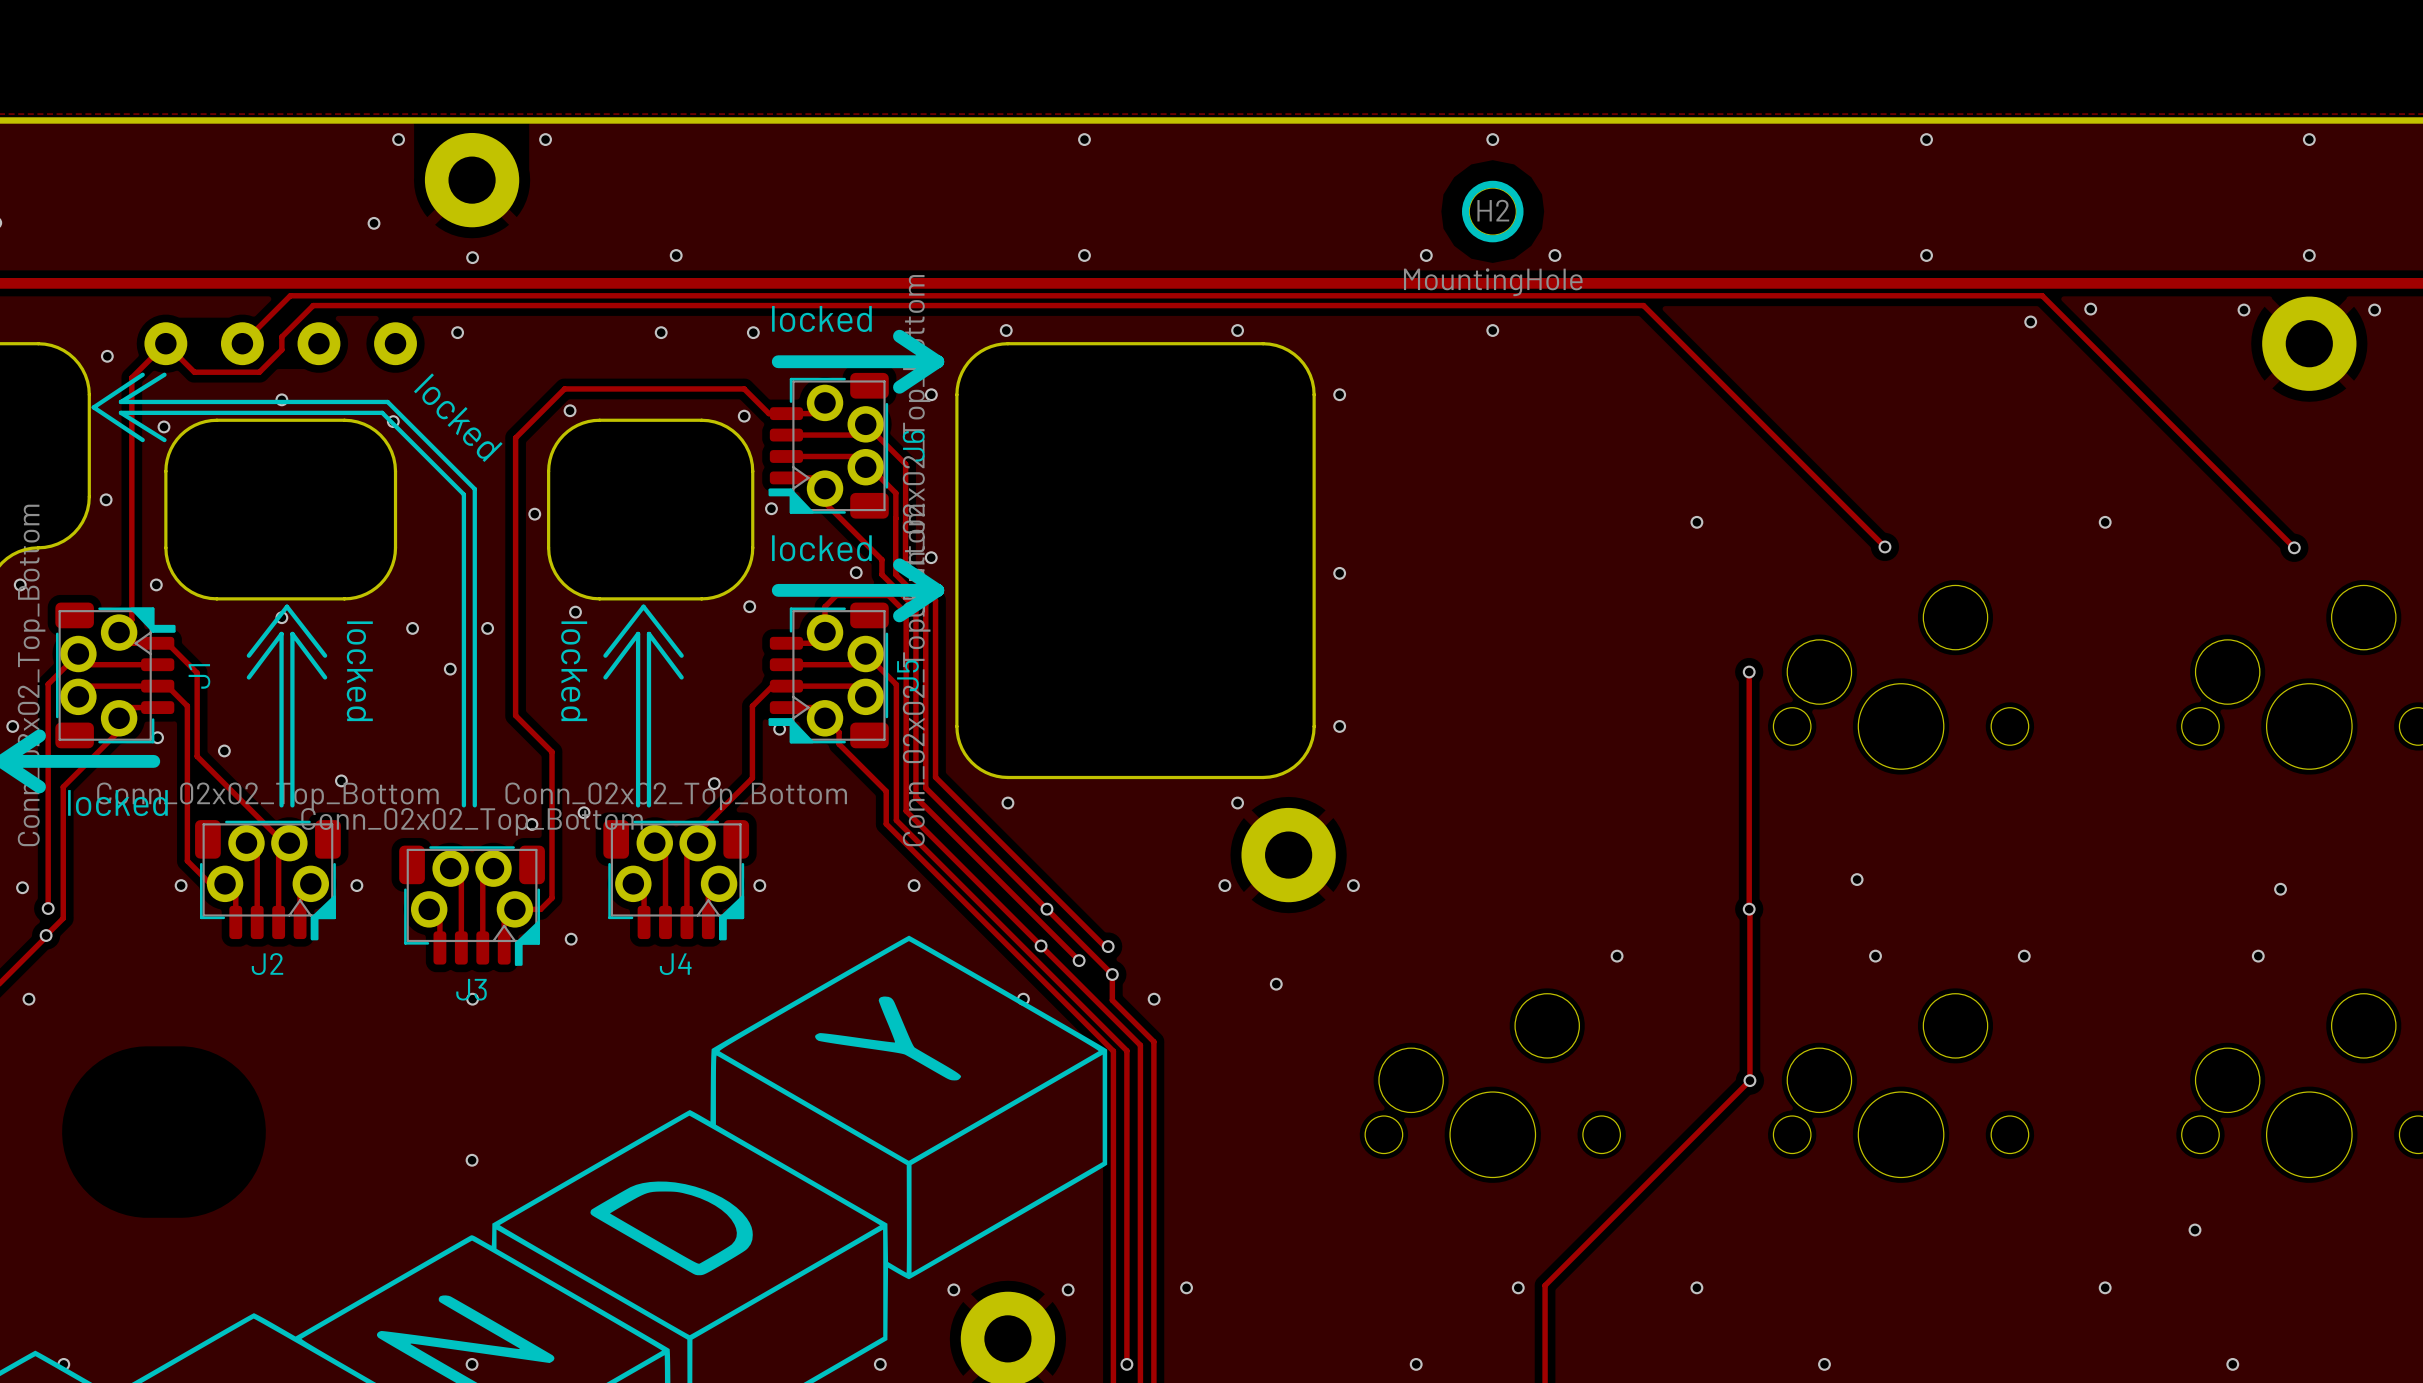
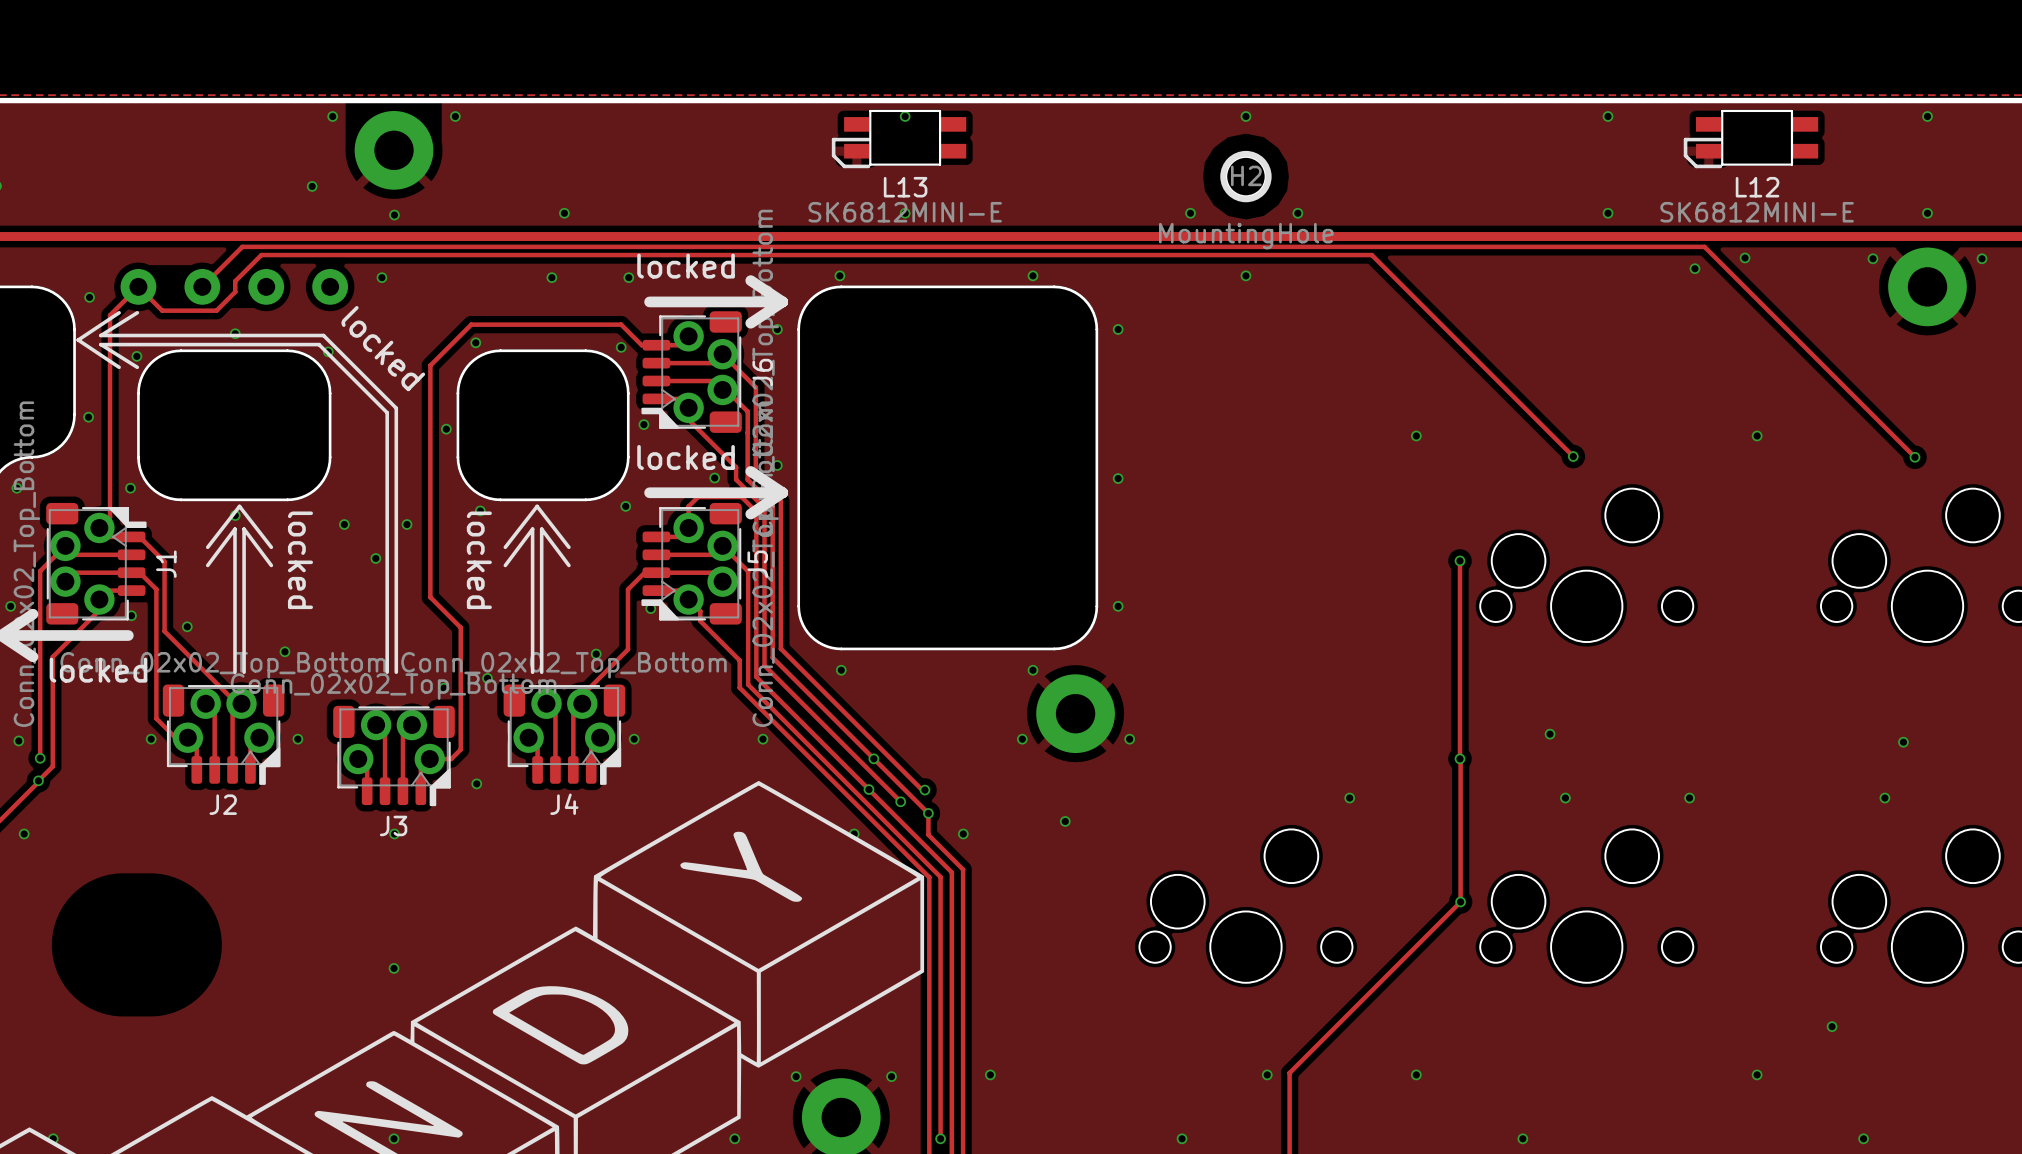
L13: none -> SK6812MINI-E (899, 139)
L12: none -> SK6812MINI-E (1750, 139)

